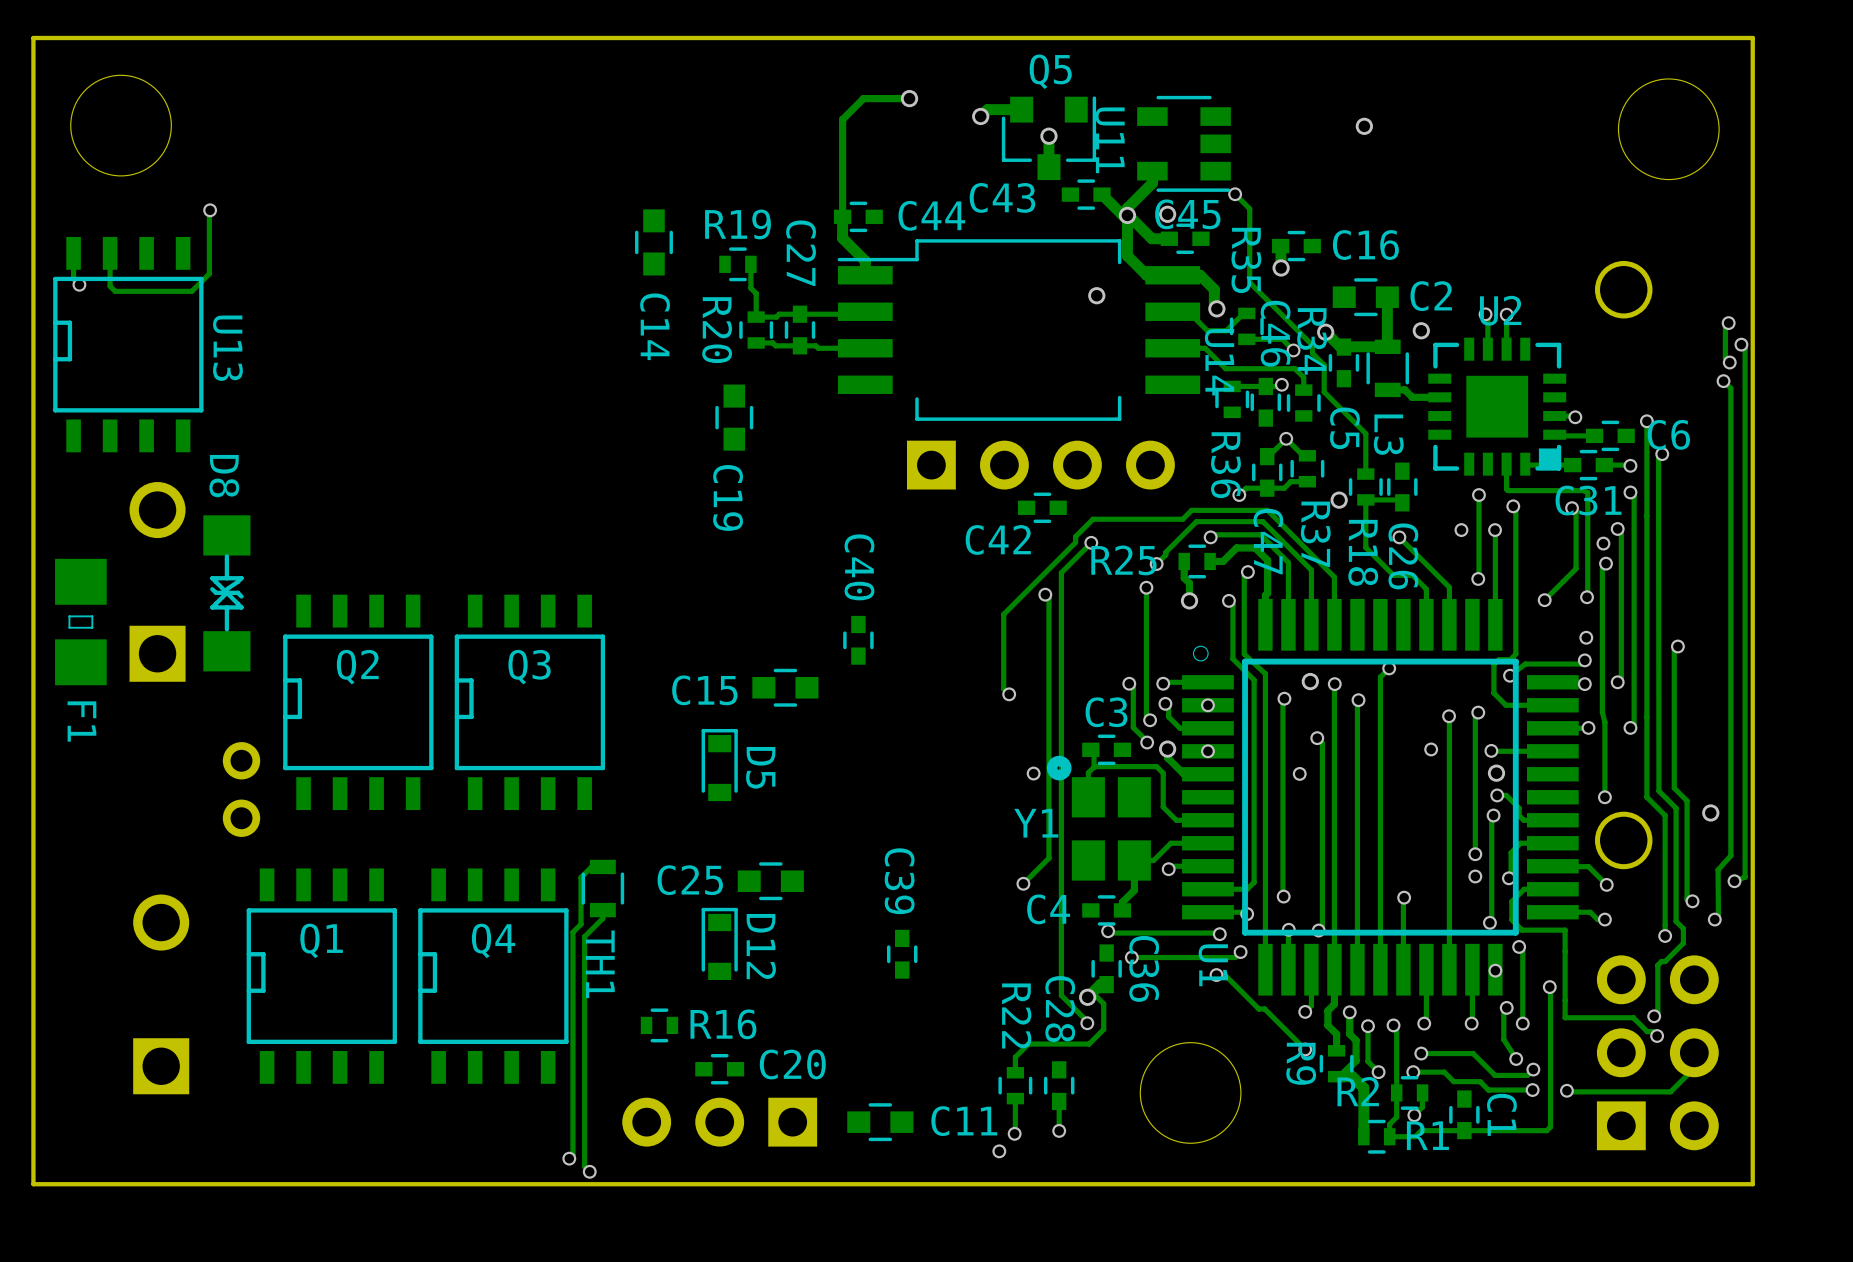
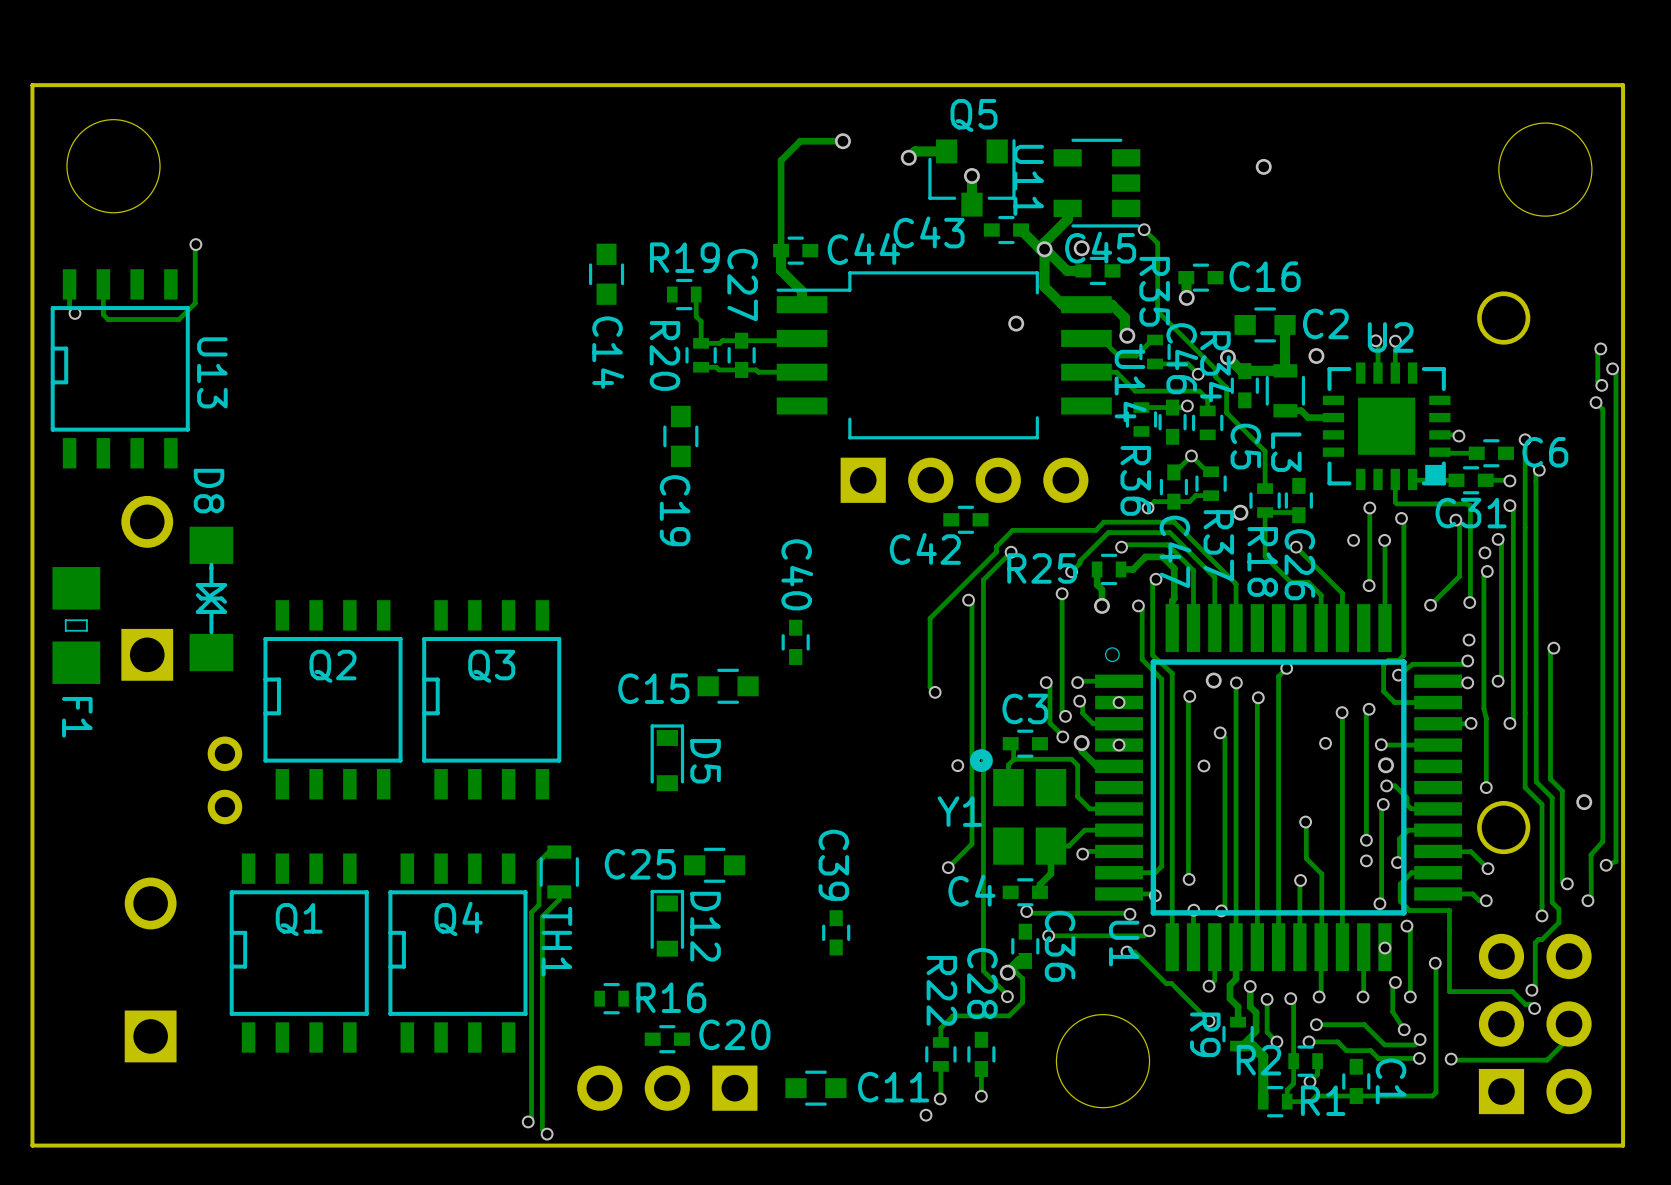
track: none -> (1305, 822) (1306, 858) (1321, 874) (1321, 947)
via: none -> (1305, 822)

